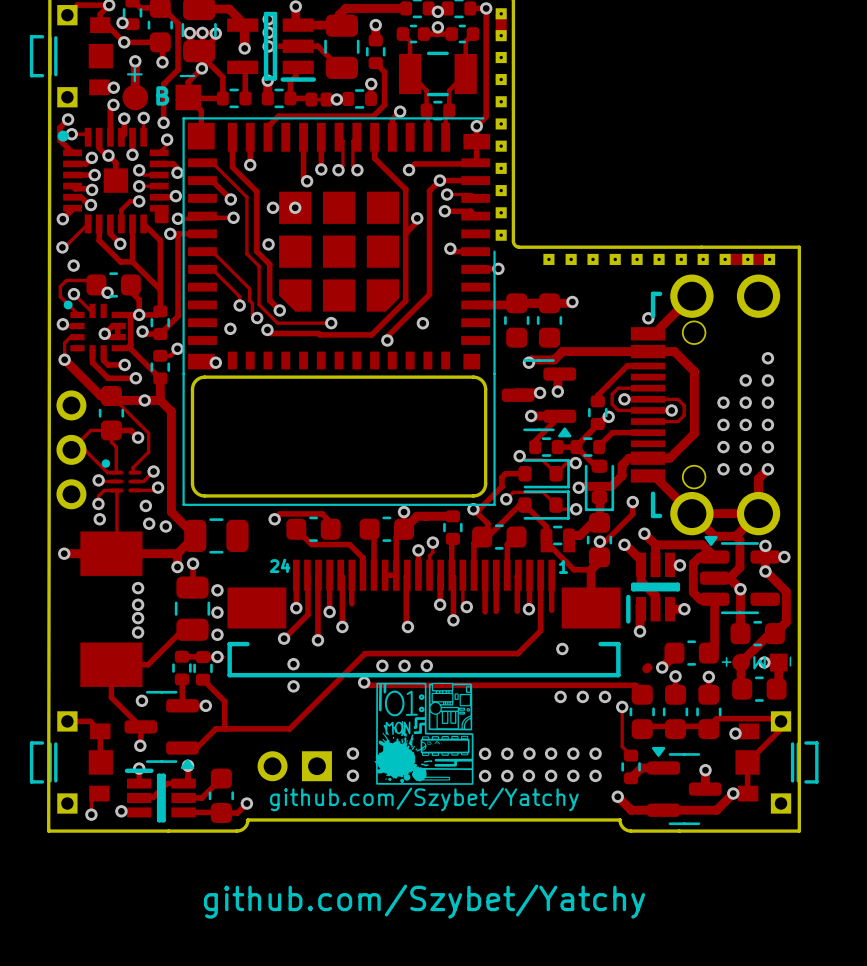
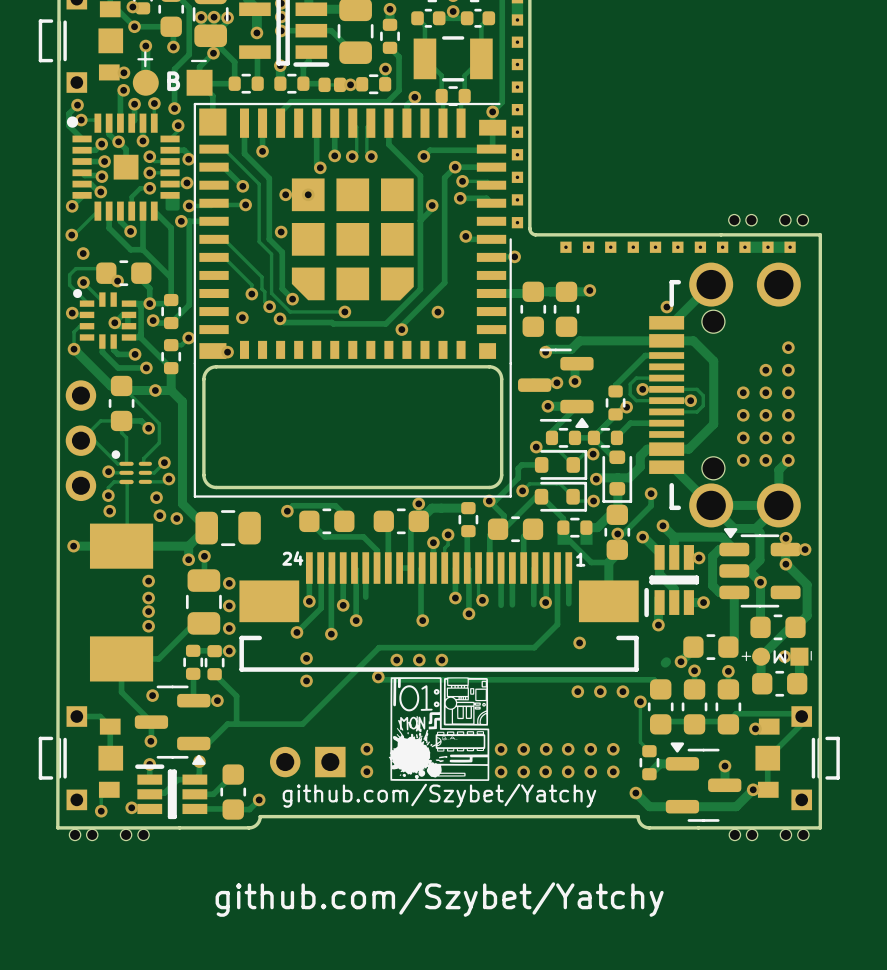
part: none -> (768, 220)
part: none -> (109, 834)
part: none -> (769, 834)

